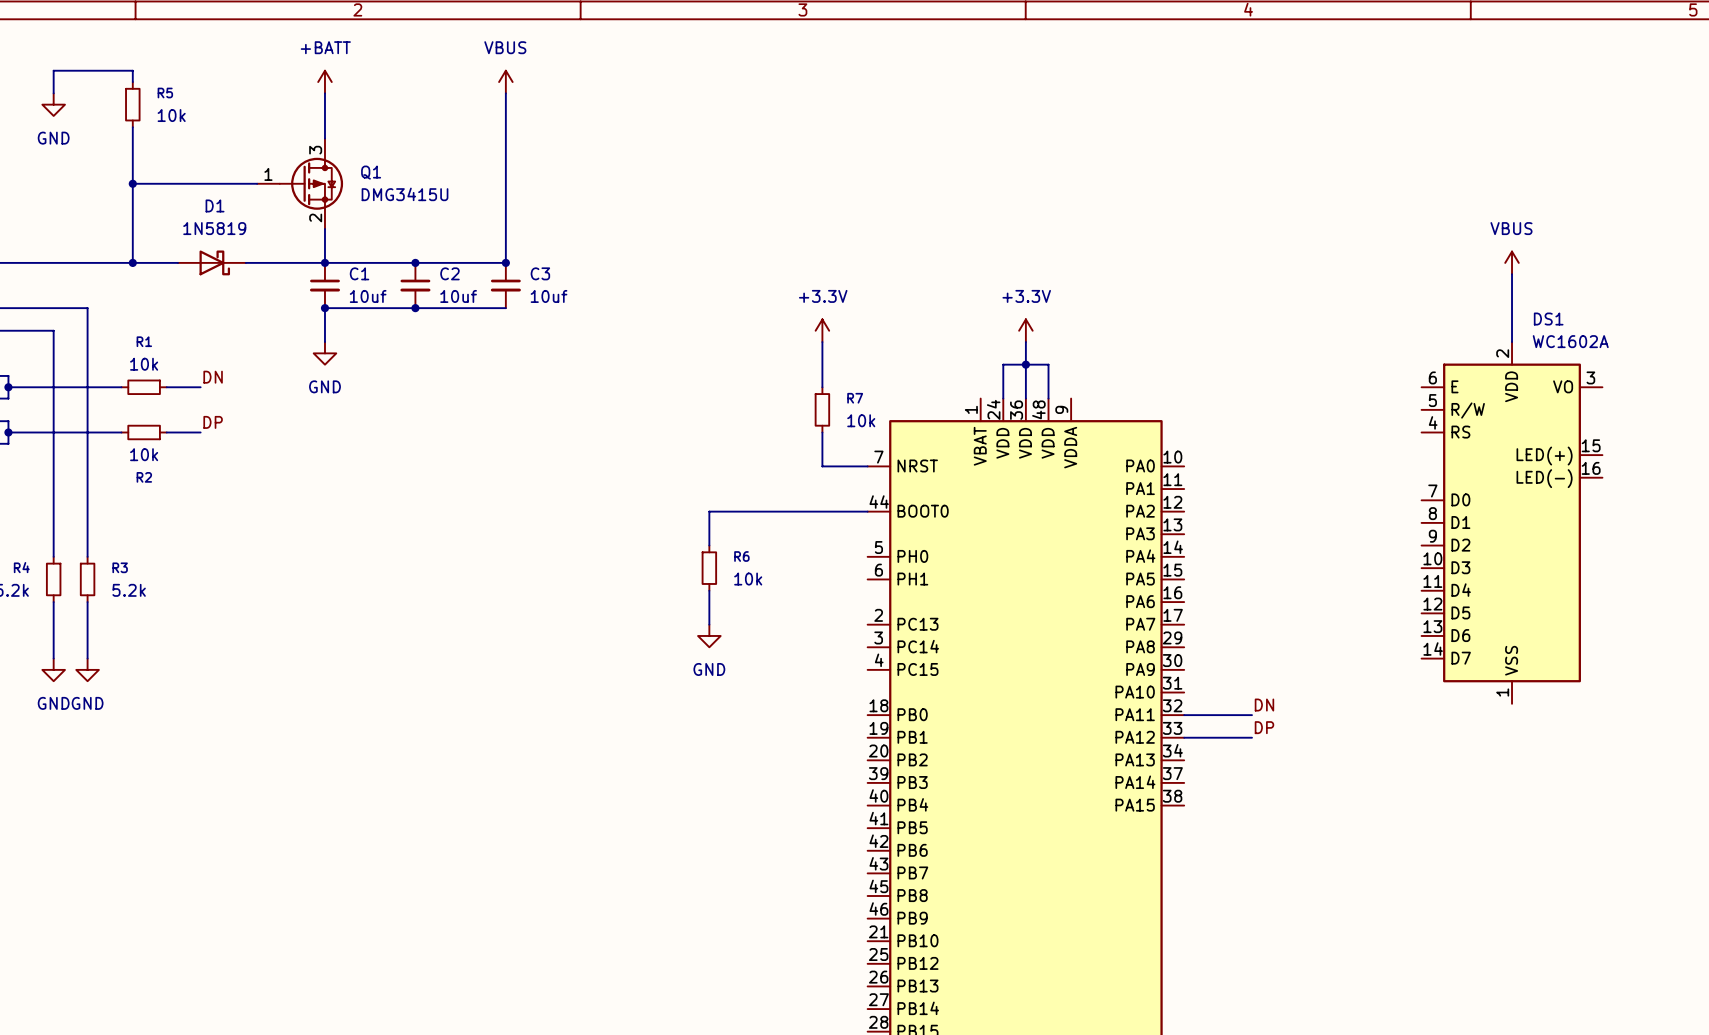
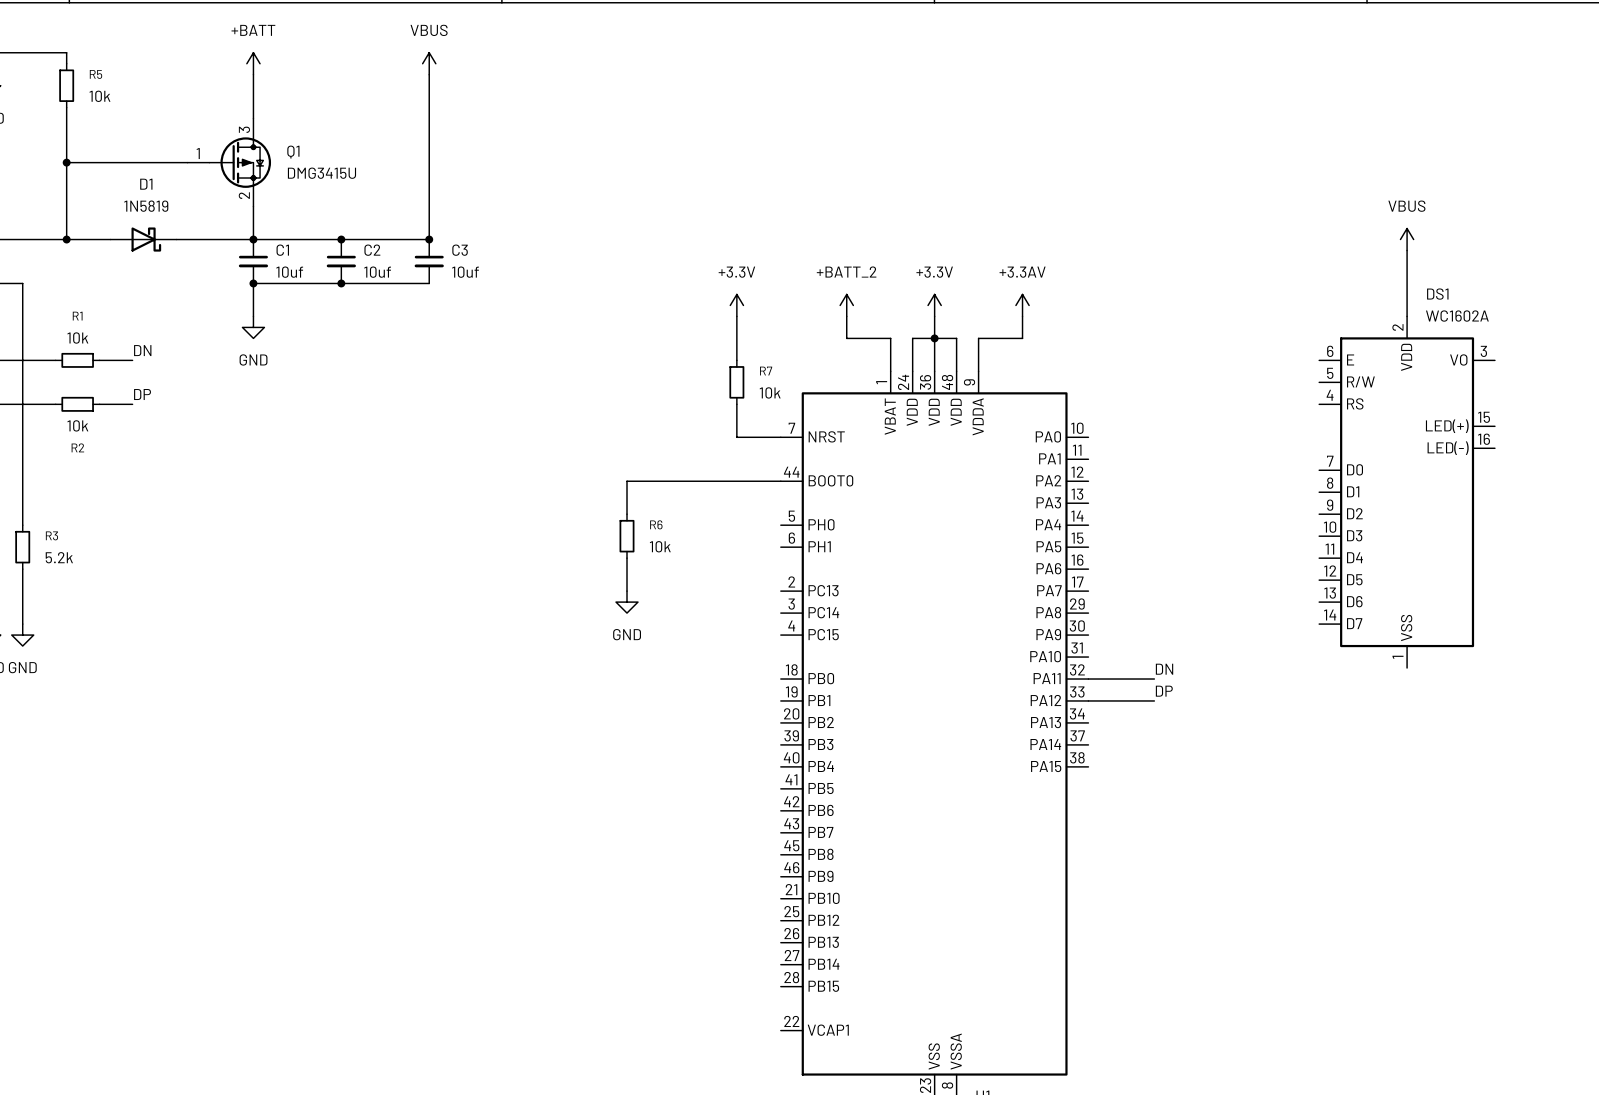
power symbol: none -> +BATT_2 (846, 305)
power symbol: none -> +3.3AV (1022, 305)
wire: none -> (846, 316) (846, 338) (890, 338) (890, 371)
wire: none -> (1022, 316) (1022, 338) (978, 338) (978, 371)

